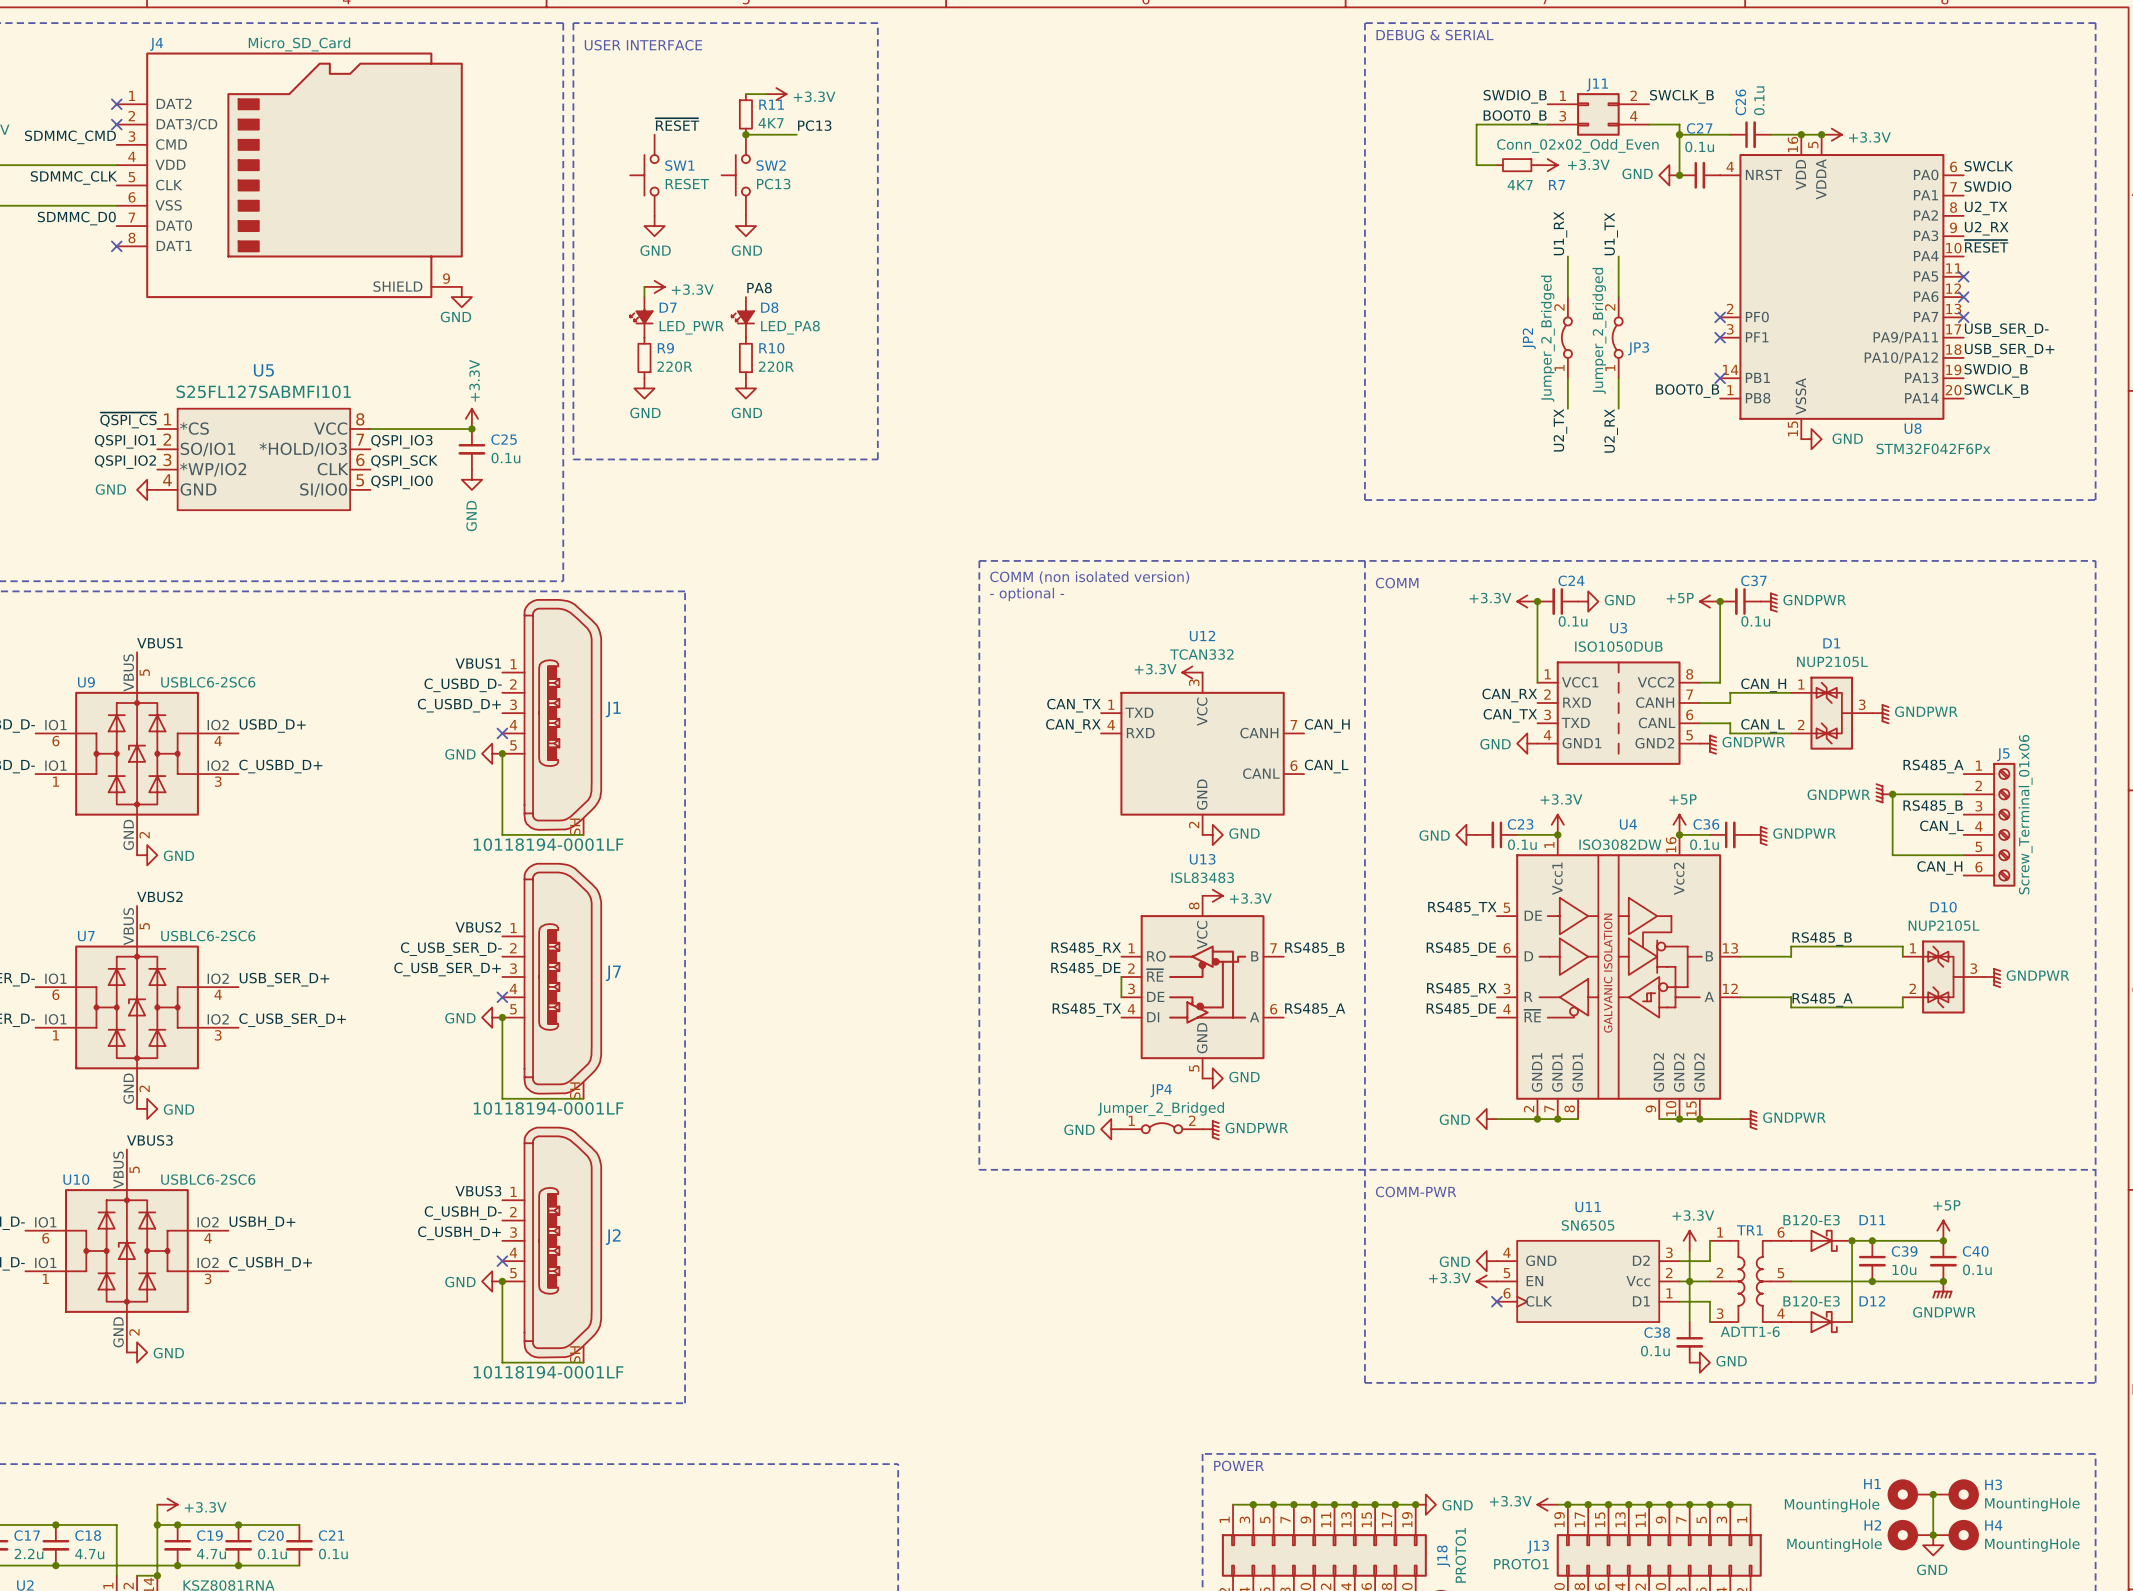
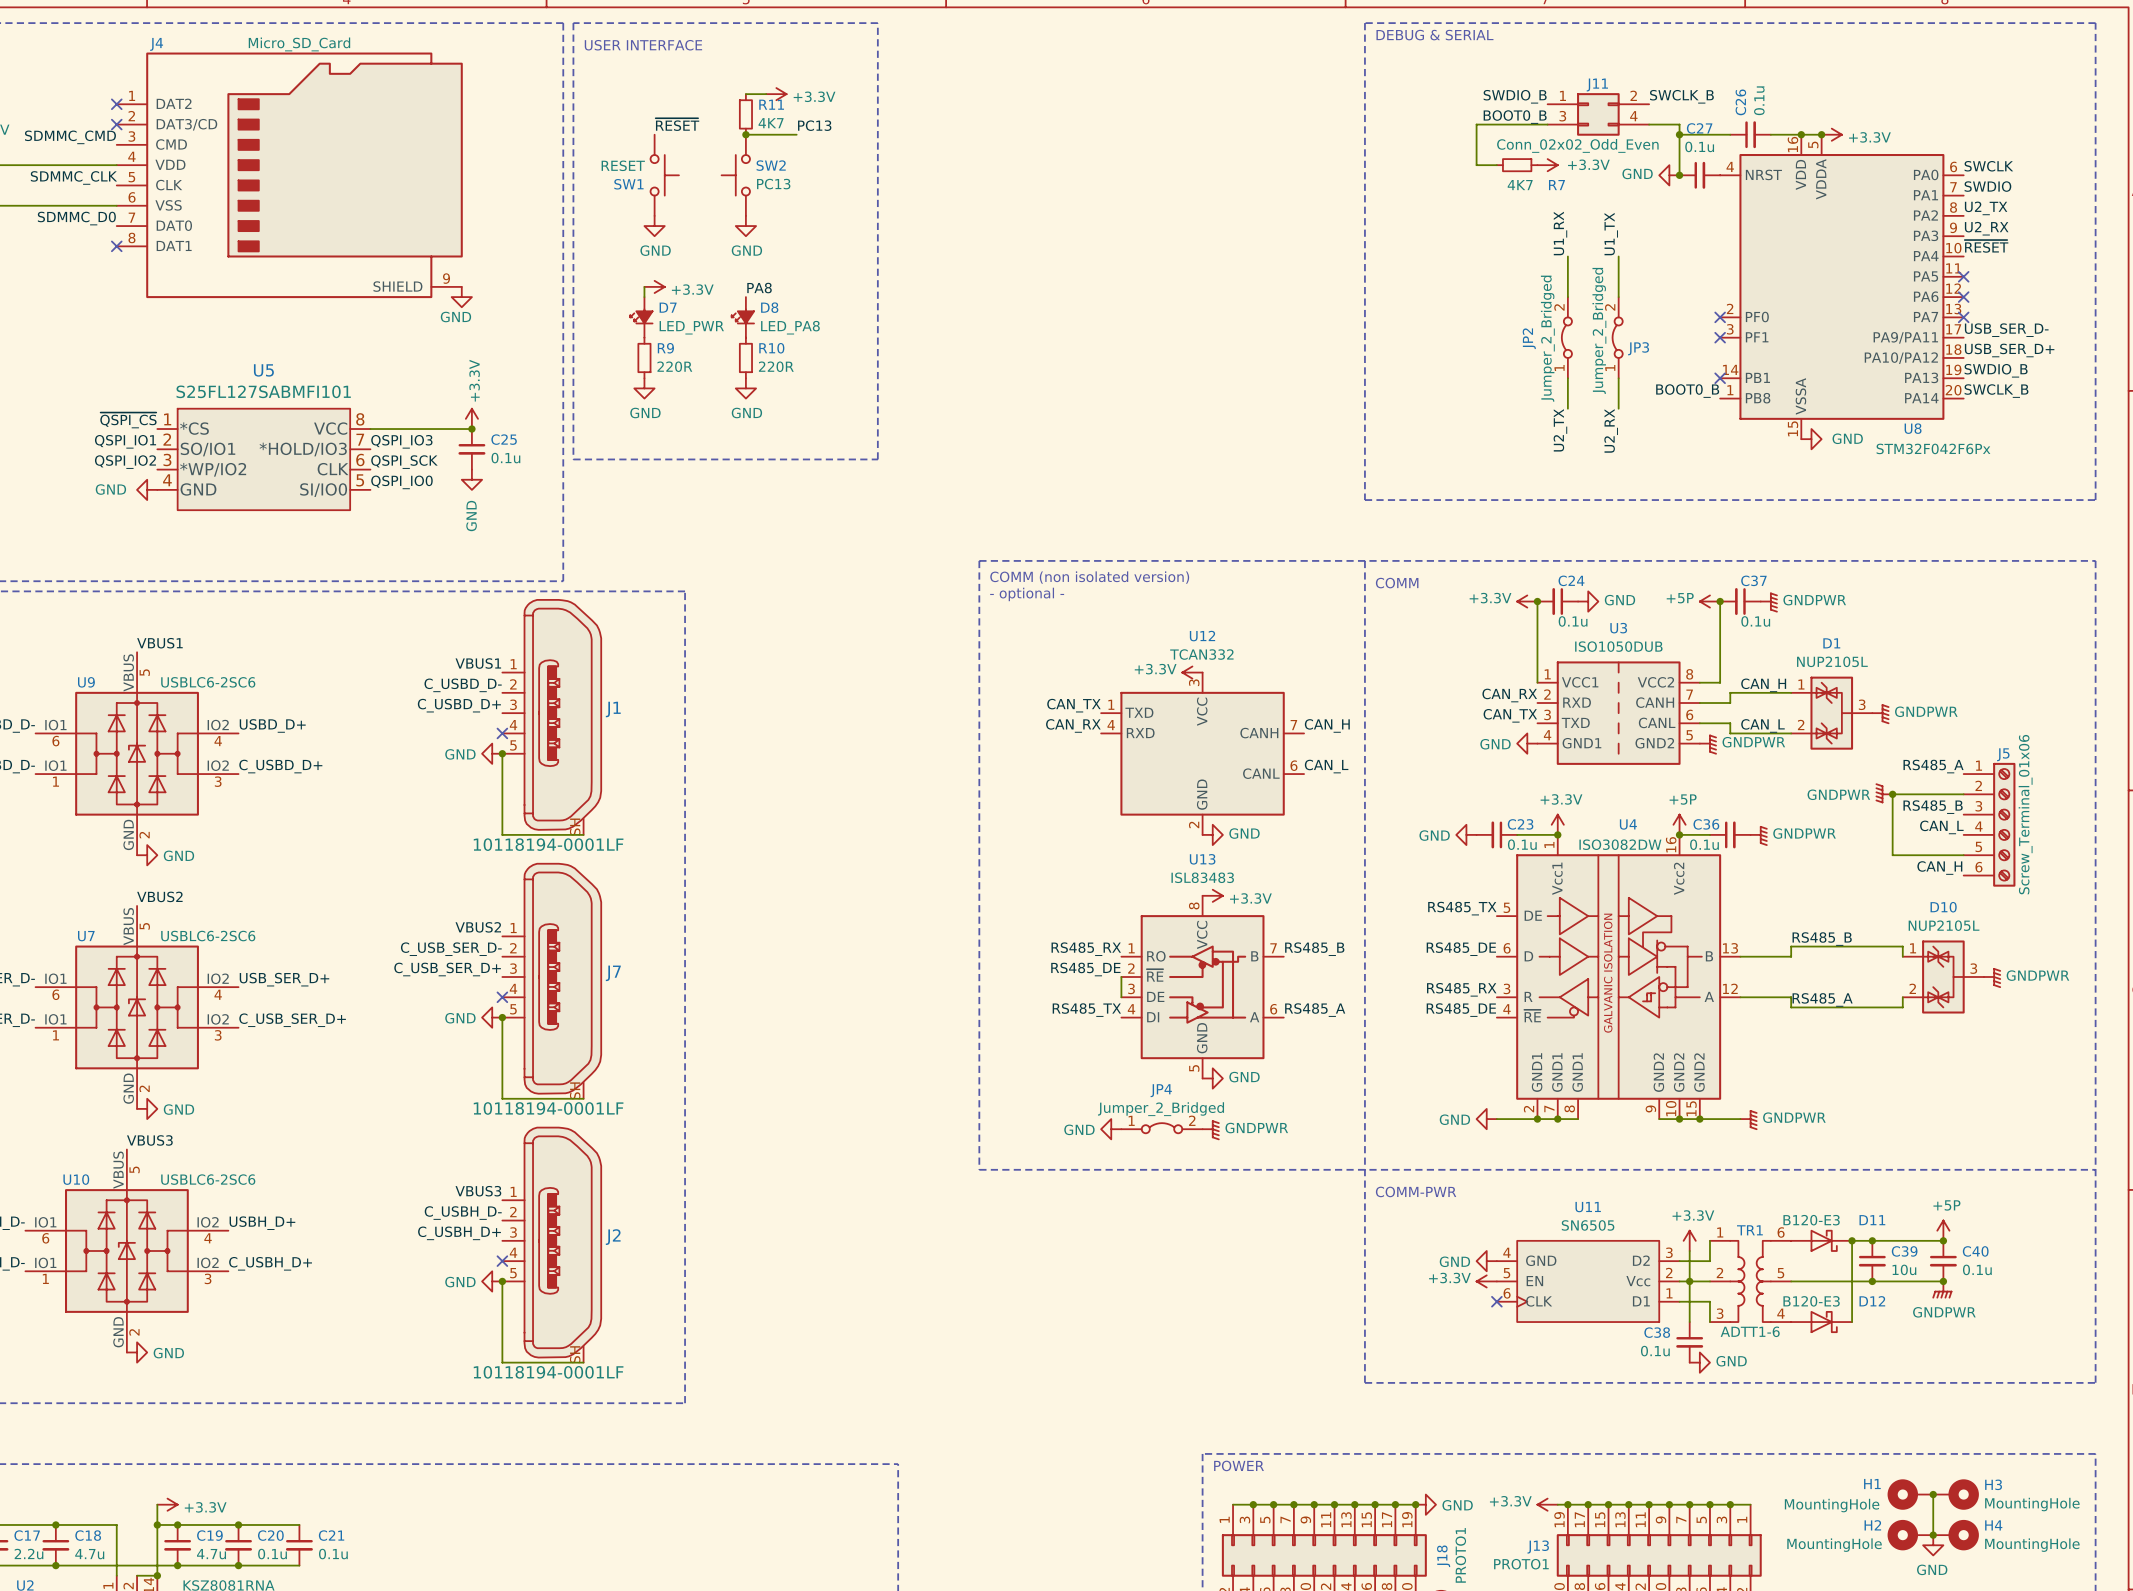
SW1 rotation: 0° (644, 175) -> 180° (664, 175)

